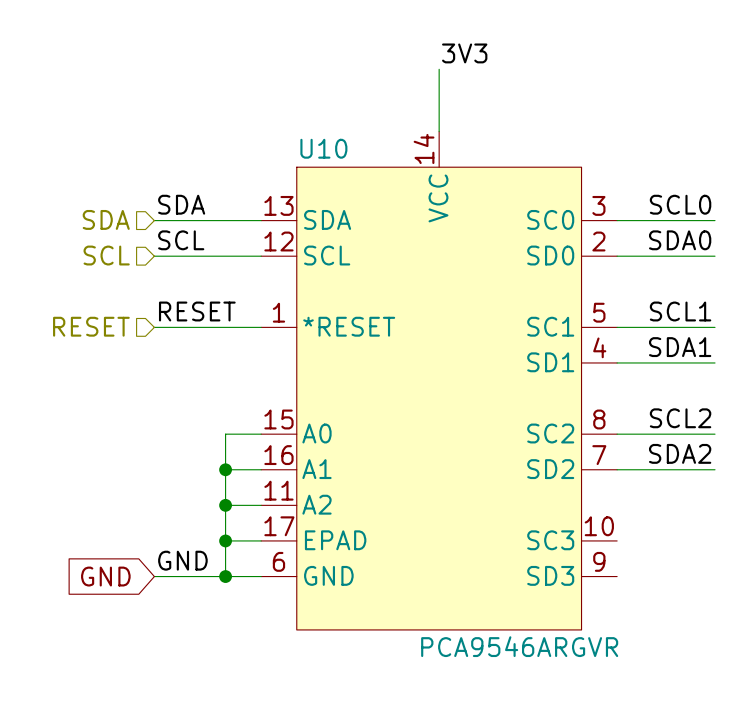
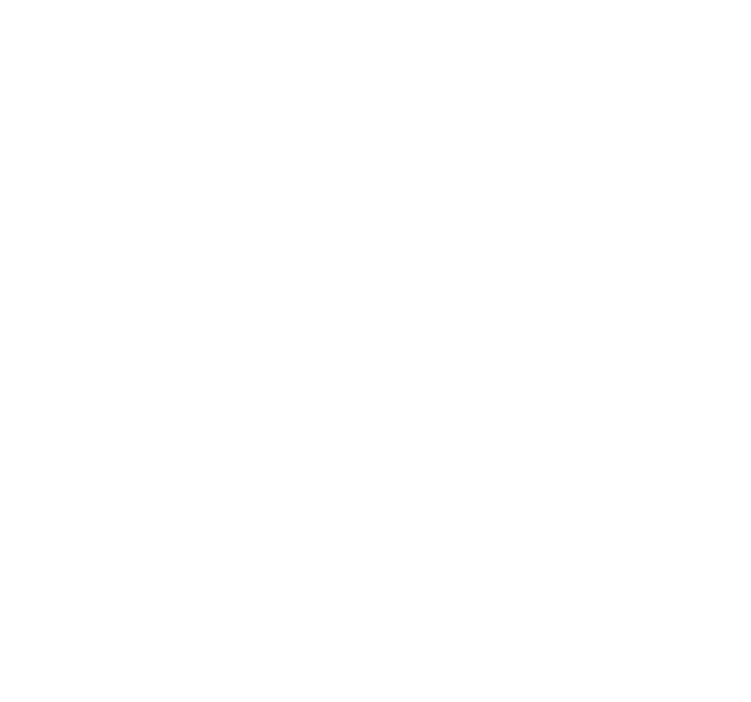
label: 3V3 (464, 53) -> none
wire: (439, 69) (439, 131) -> none
label: SDA (181, 204) -> none
label: SCL0 (680, 204) -> none
hierarchical label: SDA (106, 219) -> none
wire: (154, 220) (261, 220) -> none
wire: (617, 220) (715, 220) -> none
label: SCL (181, 240) -> none
label: SDA0 (680, 240) -> none
hierarchical label: SCL (106, 255) -> none
wire: (154, 256) (261, 256) -> none
wire: (617, 256) (715, 256) -> none
label: RESET (197, 311) -> none
label: SCL1 (680, 311) -> none
hierarchical label: RESET (91, 326) -> none
wire: (154, 327) (261, 327) -> none
wire: (617, 327) (715, 327) -> none
label: SDA1 (680, 347) -> none
wire: (617, 362) (715, 362) -> none
U10: PCA9546ARGVR (439, 380) -> none
label: SCL2 (680, 418) -> none
wire: (261, 434) (225, 434) (225, 576) -> none
wire: (617, 434) (715, 434) -> none
label: SDA2 (680, 453) -> none
wire: (225, 469) (261, 469) -> none
junction: (225, 469) -> none
wire: (617, 469) (715, 469) -> none
wire: (225, 505) (261, 505) -> none
junction: (225, 505) -> none
wire: (225, 540) (261, 540) -> none
junction: (225, 540) -> none
label: GND (182, 560) -> none
global label: GND (105, 576) -> none
wire: (154, 576) (261, 576) -> none
junction: (225, 576) -> none

